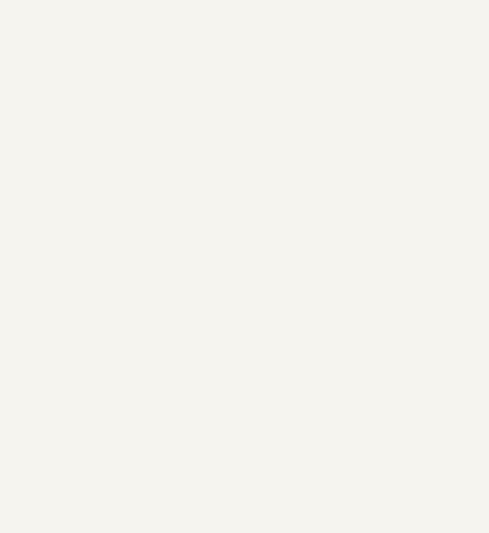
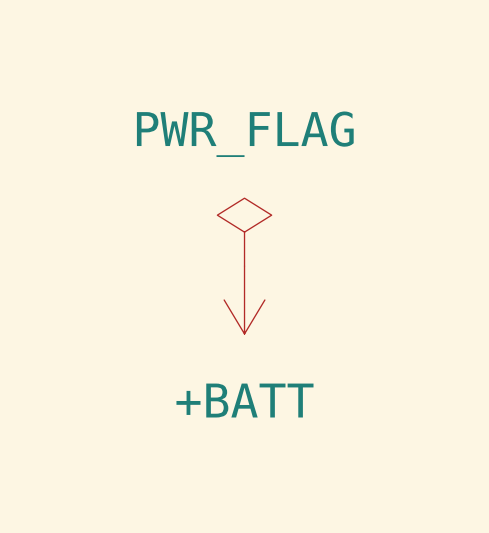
power symbol: none -> PWR_FLAG (244, 232)
power symbol: none -> +BATT (244, 300)

